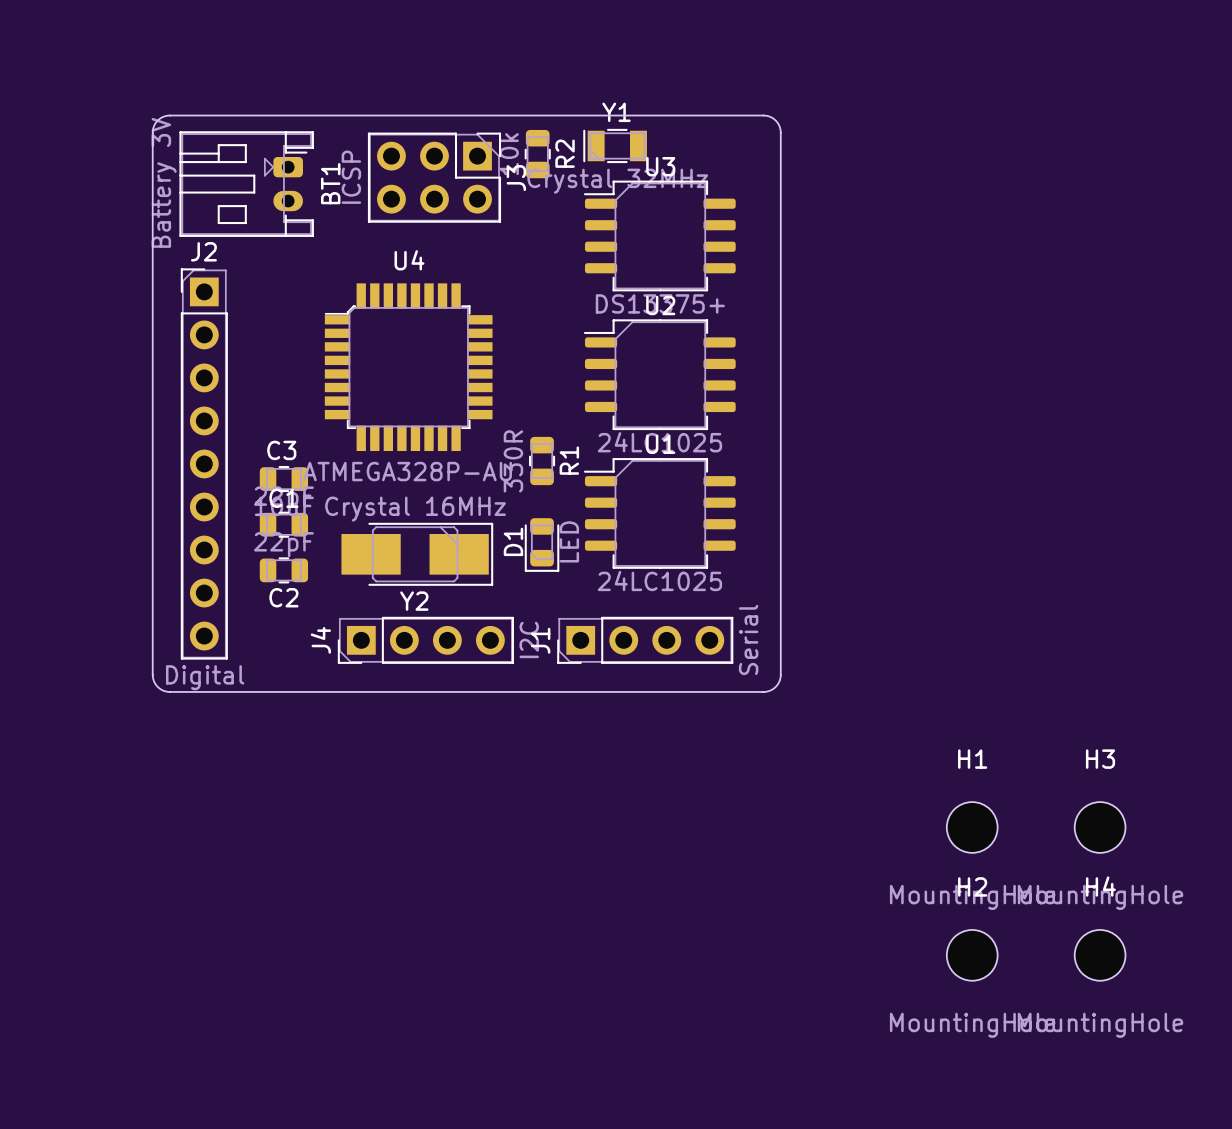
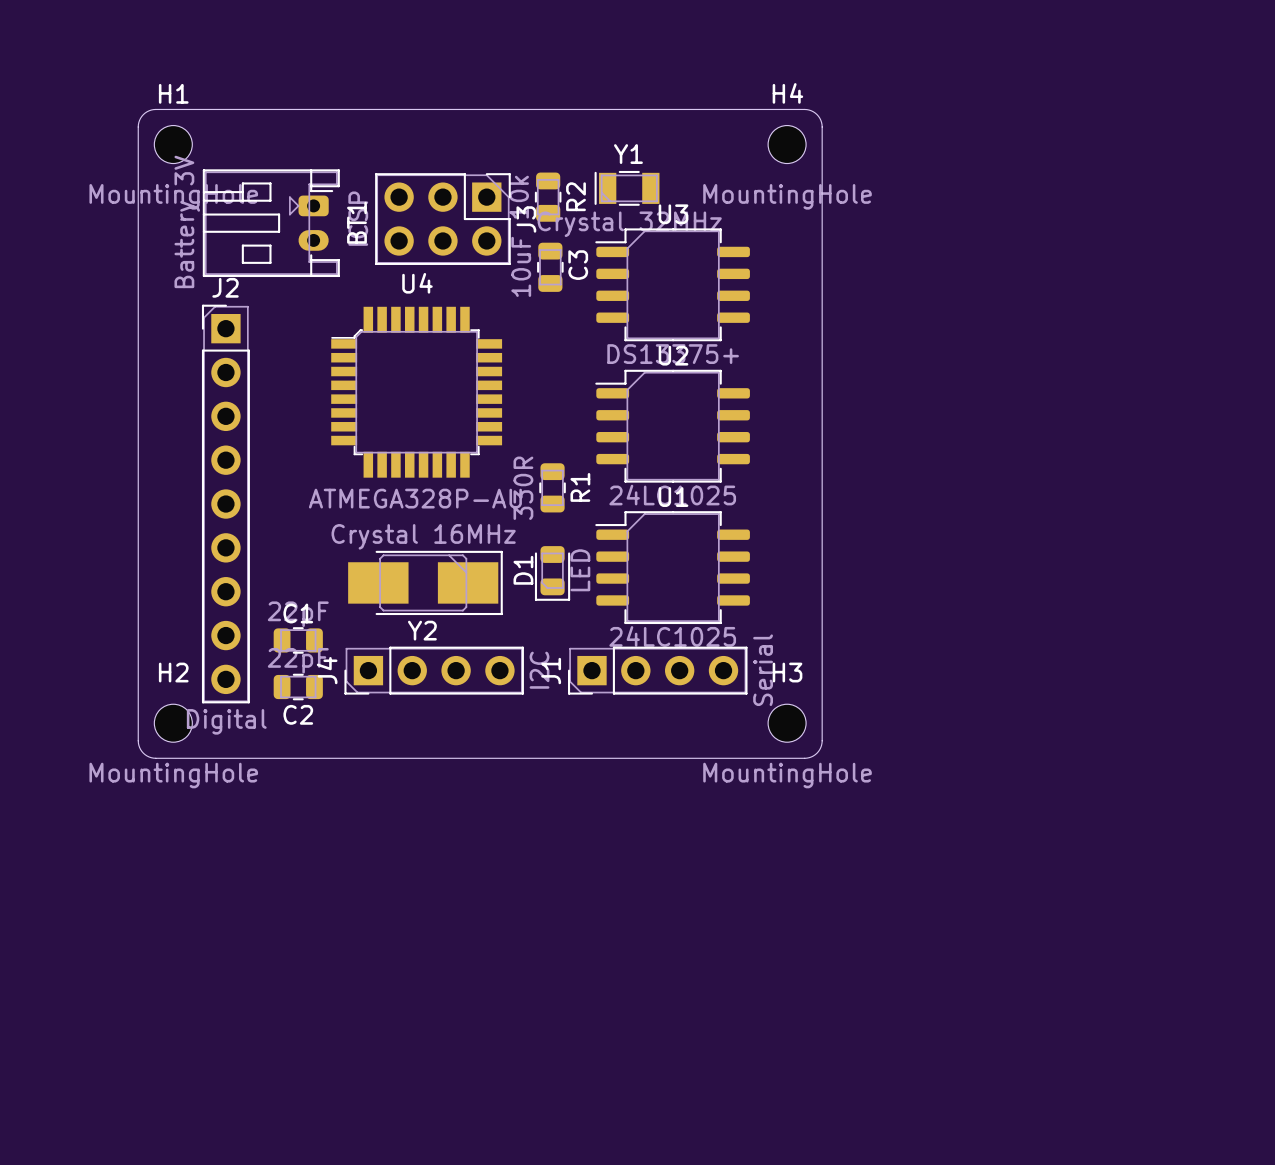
board edge: (169, 115) (763, 115) (775, 120) (780, 132) (780, 674) (775, 686) (763, 691) (169, 691) (157, 686) (152, 674) (152, 132) (157, 120) (169, 115) -> (155, 109) (143, 114) (138, 126) (138, 740) (143, 753) (155, 758) (804, 758) (817, 753) (822, 740) (822, 126) (817, 114) (804, 109) (155, 109)
Y1 position: (615, 145) -> (627, 188)
R2 position: (537, 154) -> (548, 197)
J3 position: (434, 177) -> (442, 219)
BT1 position: (246, 184) -> (271, 223)
U3 position: (659, 235) -> (672, 284)
U2 position: (659, 374) -> (672, 426)
J2 position: (204, 463) -> (225, 504)
C3 rotation: 0° (283, 479) -> 90° clockwise (550, 267)
C3 position: (283, 479) -> (550, 267)
U1 position: (659, 513) -> (672, 567)
C1 position: (283, 524) -> (298, 640)
C2 position: (283, 570) -> (298, 687)
H1 footprint: [946, 802, 998, 853] -> [154, 125, 193, 164]
H3 footprint: [1074, 802, 1126, 853] -> [768, 704, 807, 743]
H2 footprint: [946, 929, 998, 981] -> [154, 704, 193, 743]
H4 footprint: [1074, 929, 1126, 981] -> [768, 125, 807, 164]

